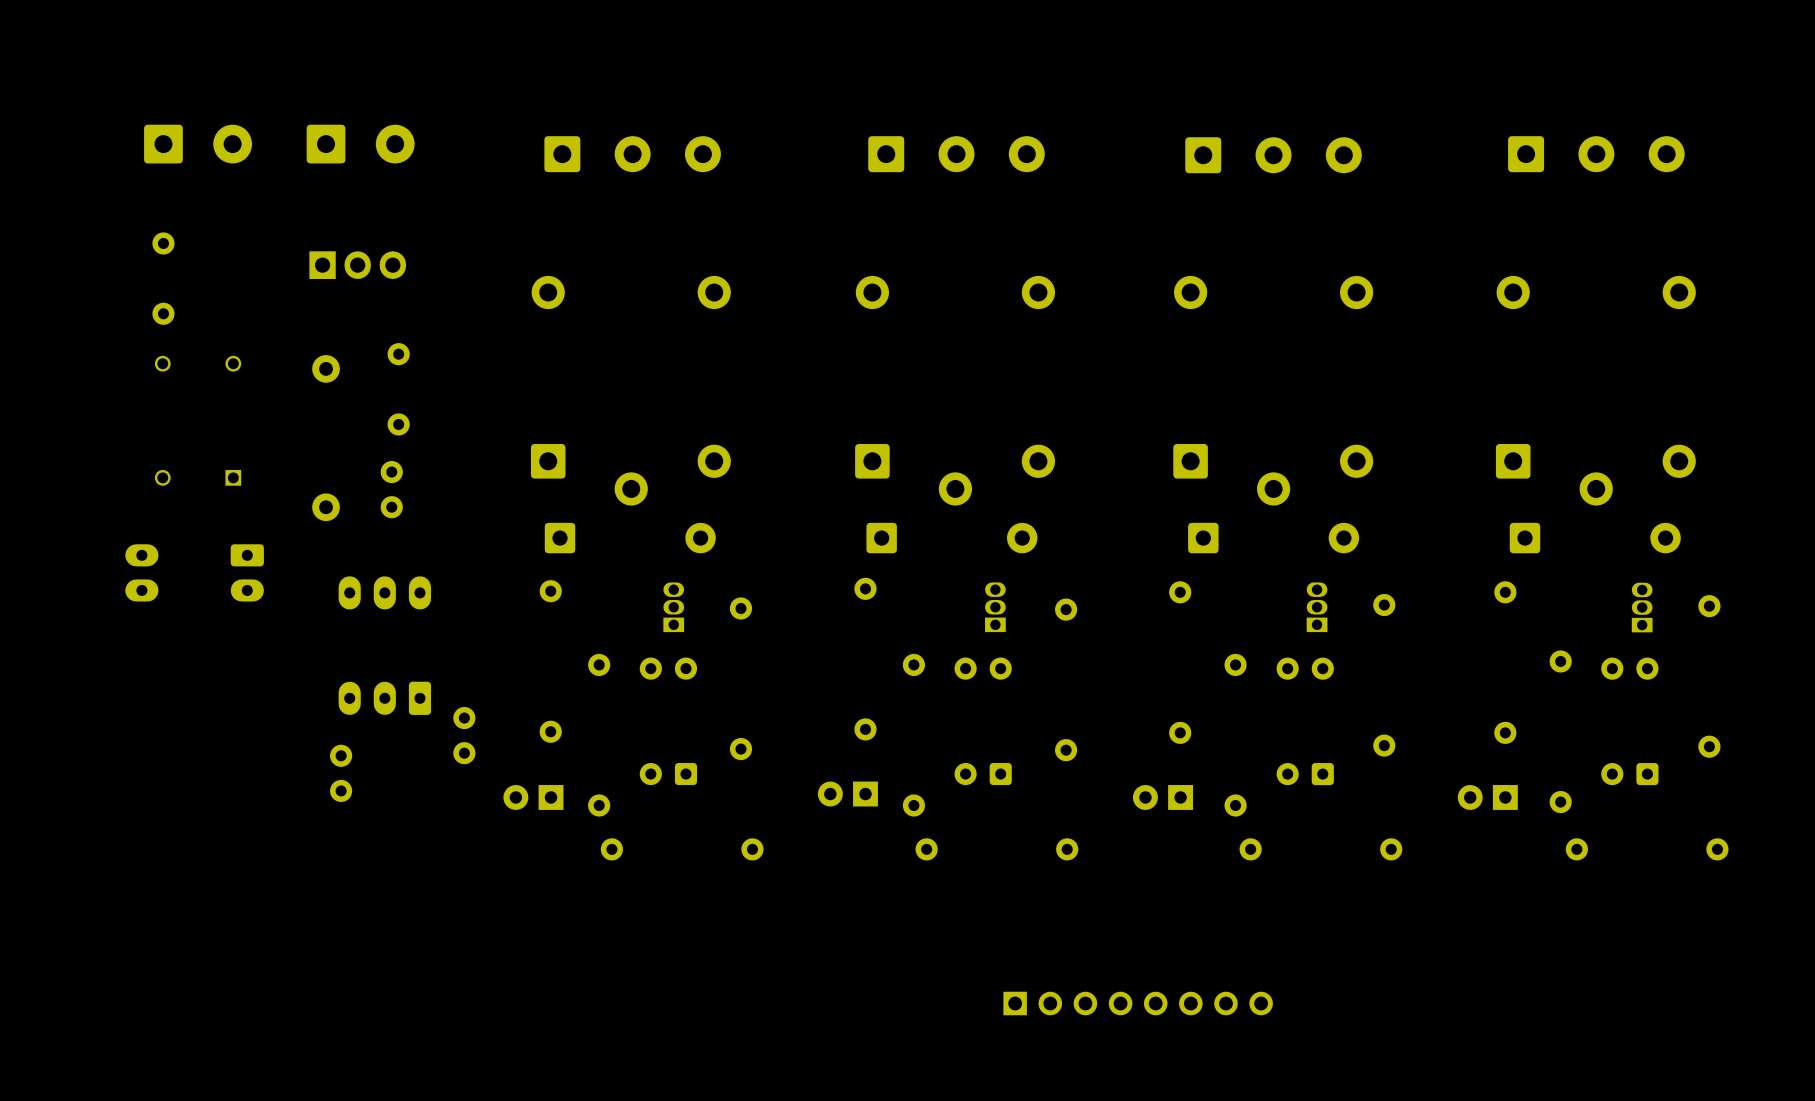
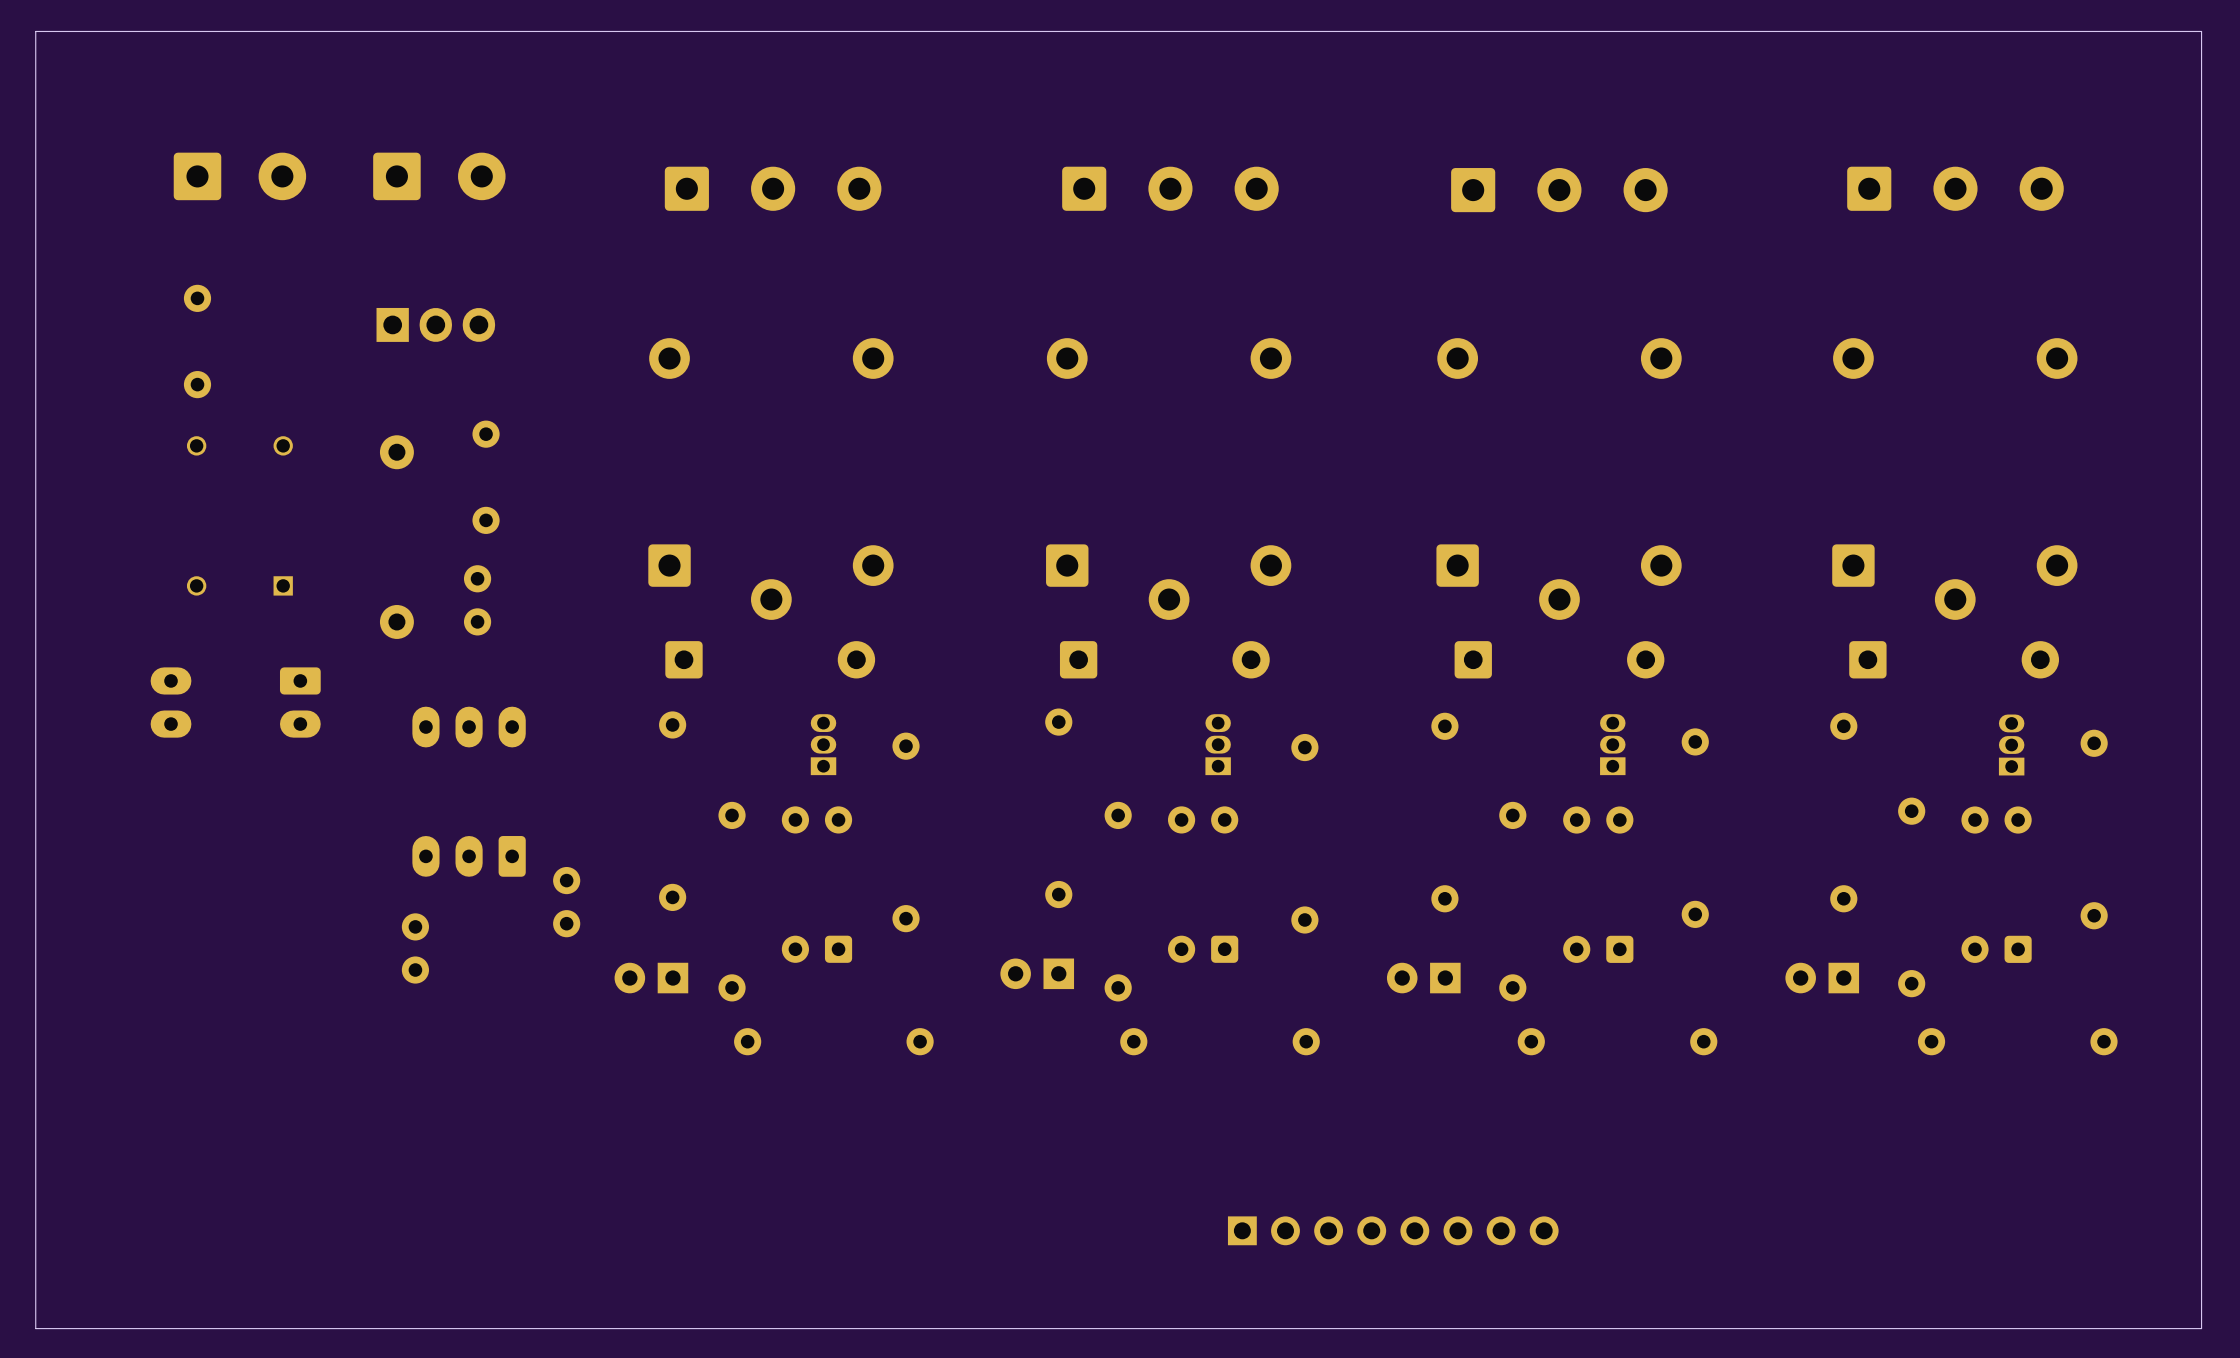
board edge: none -> (2201, 31) (35, 31) (35, 1328) (2201, 1328) (2201, 31)

